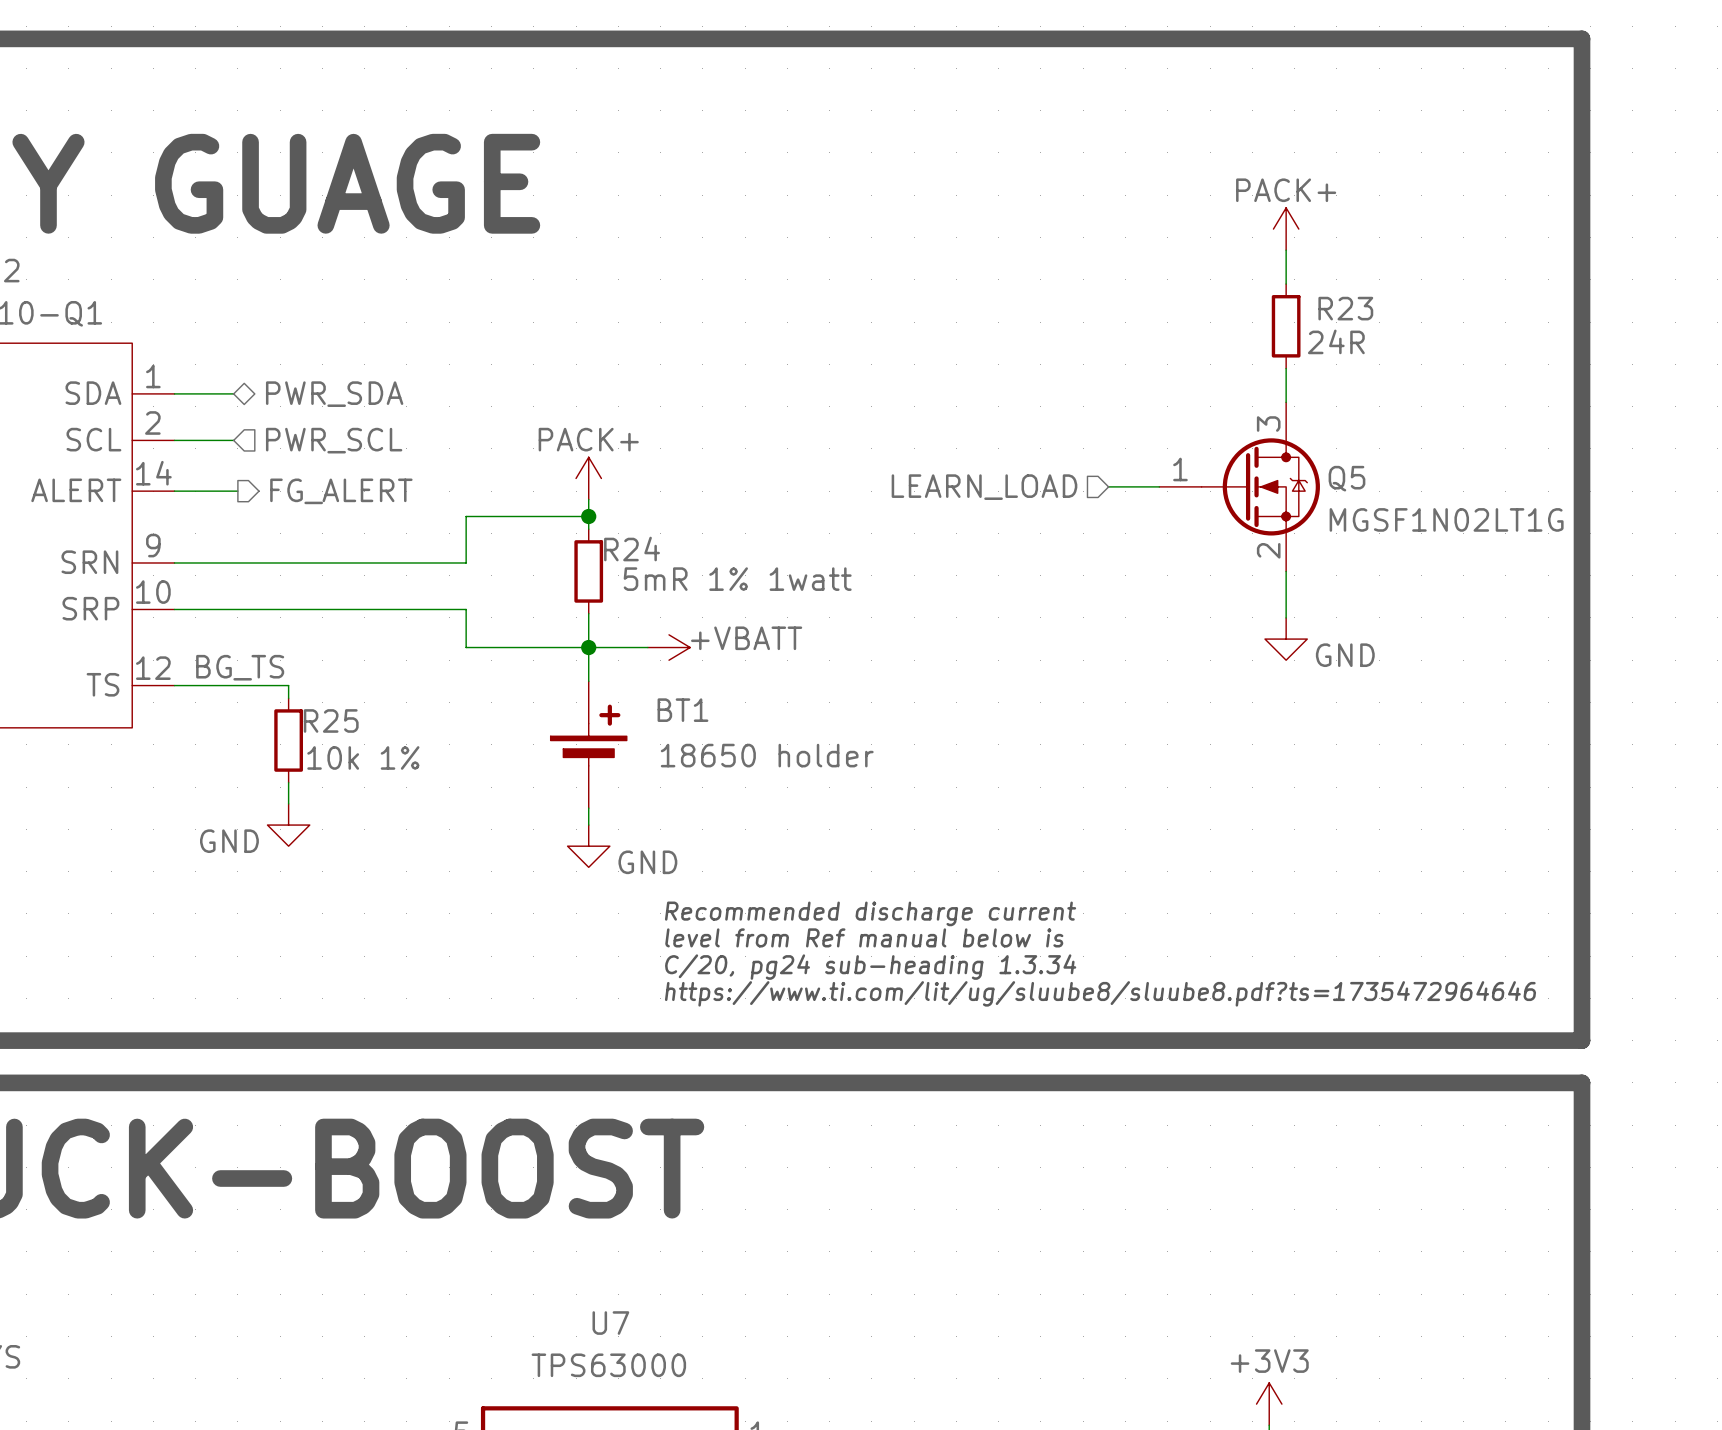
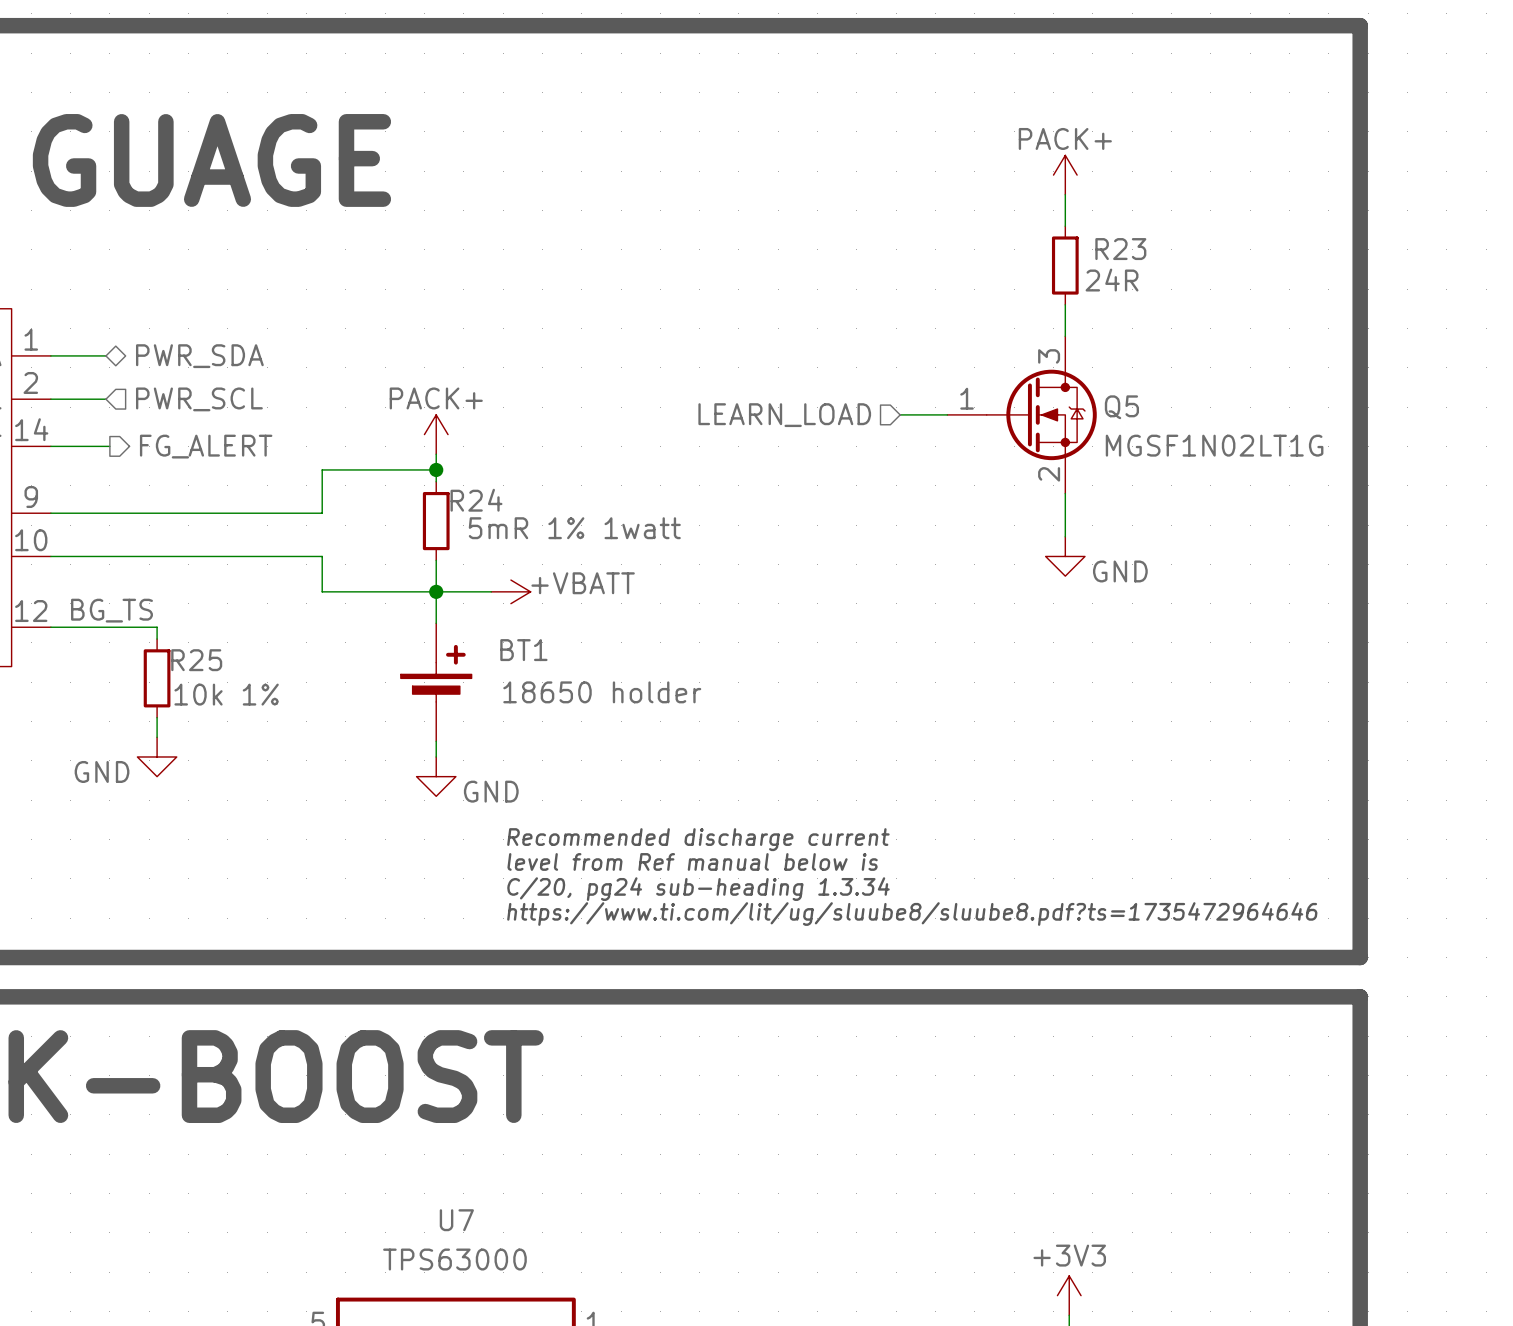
power symbol position: PACK+ (1286, 229) -> PACK+ (1065, 175)
wire: (1286, 250) (1286, 284) -> (1065, 194) (1065, 226)
R23 position: (1286, 326) -> (1065, 265)
wire: (1286, 368) (1286, 402) -> (1065, 304) (1065, 336)
wire: (1108, 486) (1159, 486) -> (900, 414) (947, 414)
Q5 position: (1239, 486) -> (1022, 414)
hierarchical label position: LEARN_LOAD (984, 487) -> LEARN_LOAD (784, 415)
wire: (1286, 571) (1286, 617) -> (1065, 493) (1065, 536)
power symbol position: GND (1286, 639) -> GND (1065, 556)

